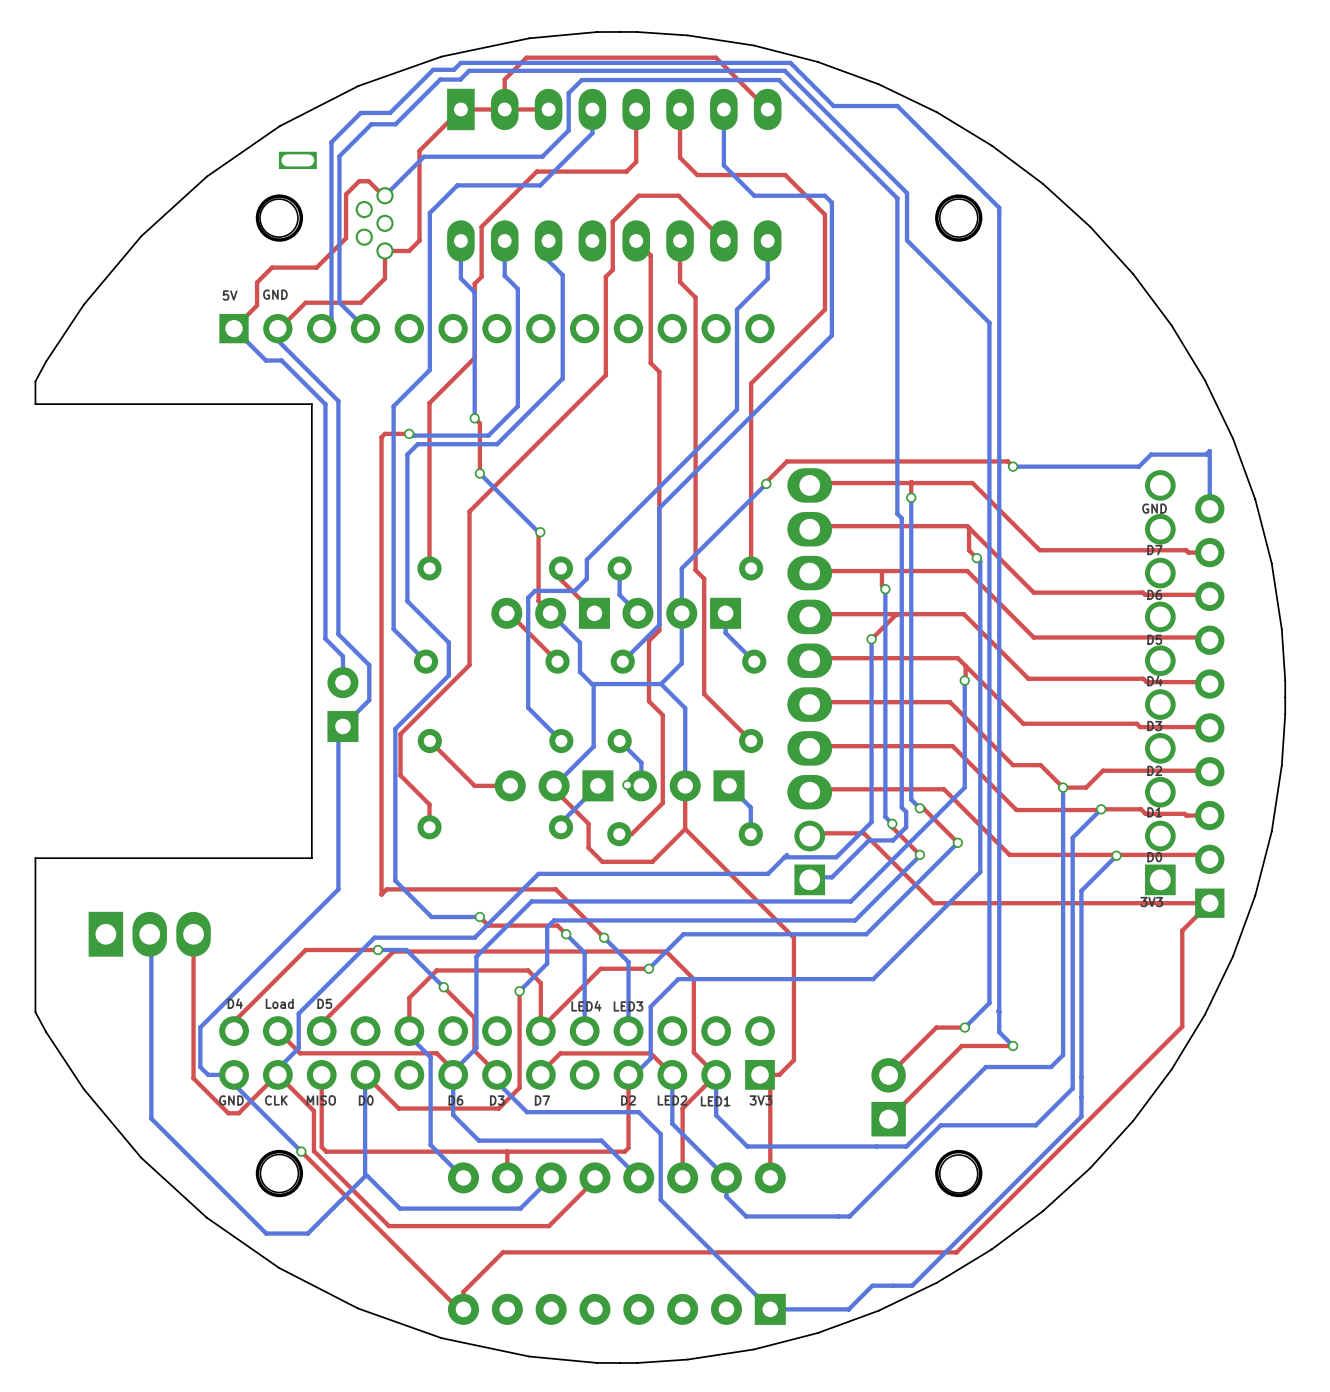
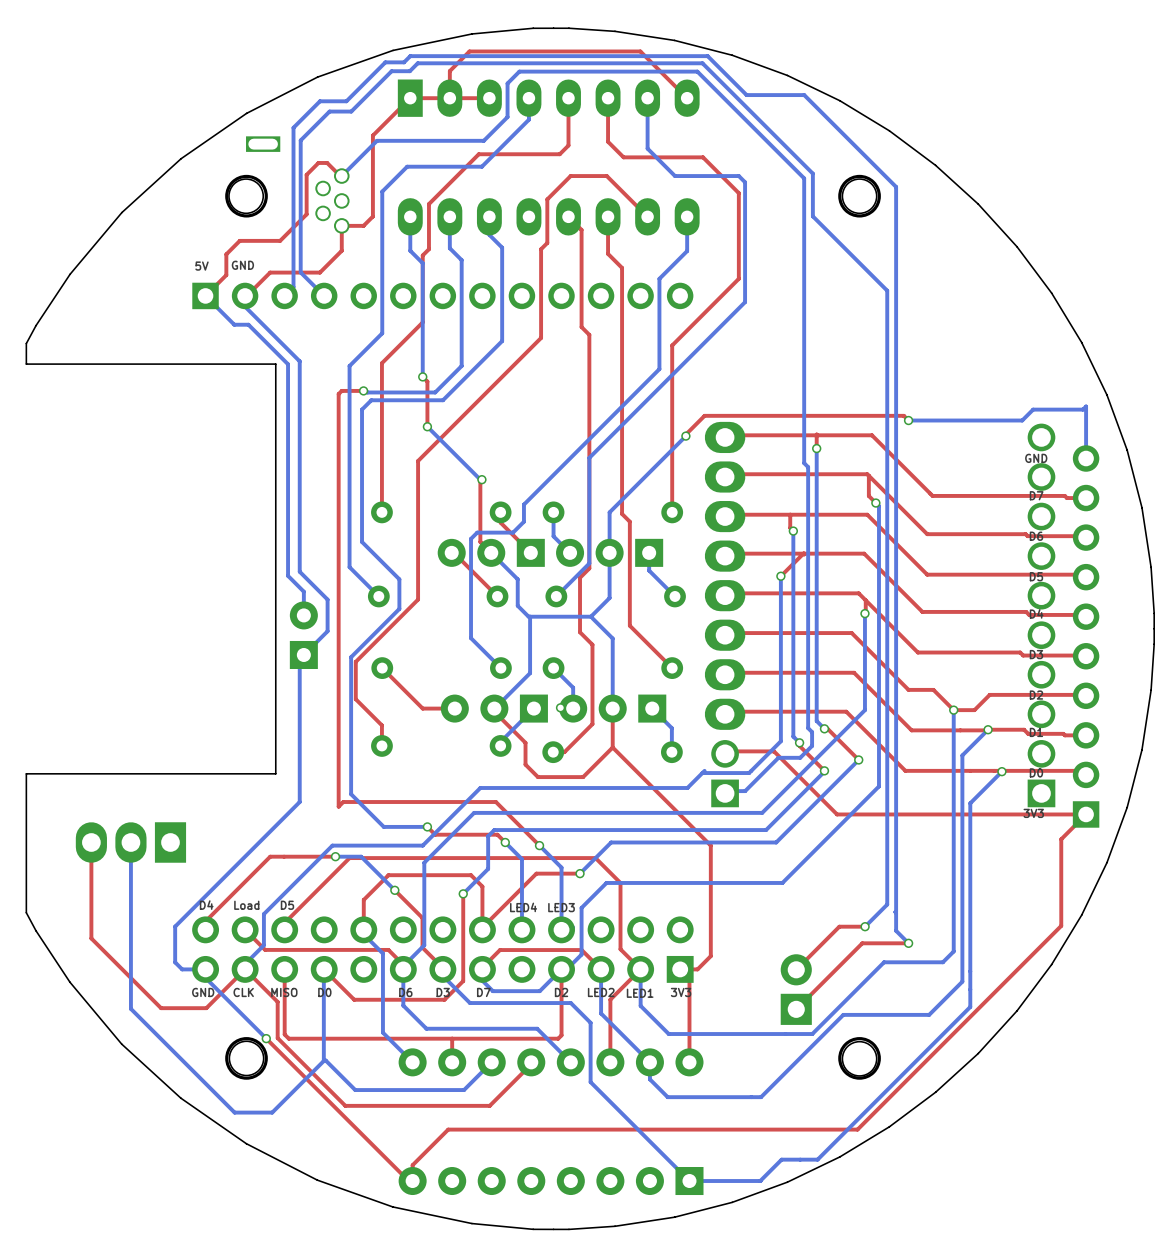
part rotation: 0° (149, 934) -> 180° (130, 842)
top track: (193, 934) (193, 1078) (228, 1113) (238, 1113) (277, 1074) -> (91, 842) (91, 938) (161, 1008) (206, 1008) (245, 969)
bottom track: none -> (561, 969) (539, 991) (492, 991) (482, 980)

